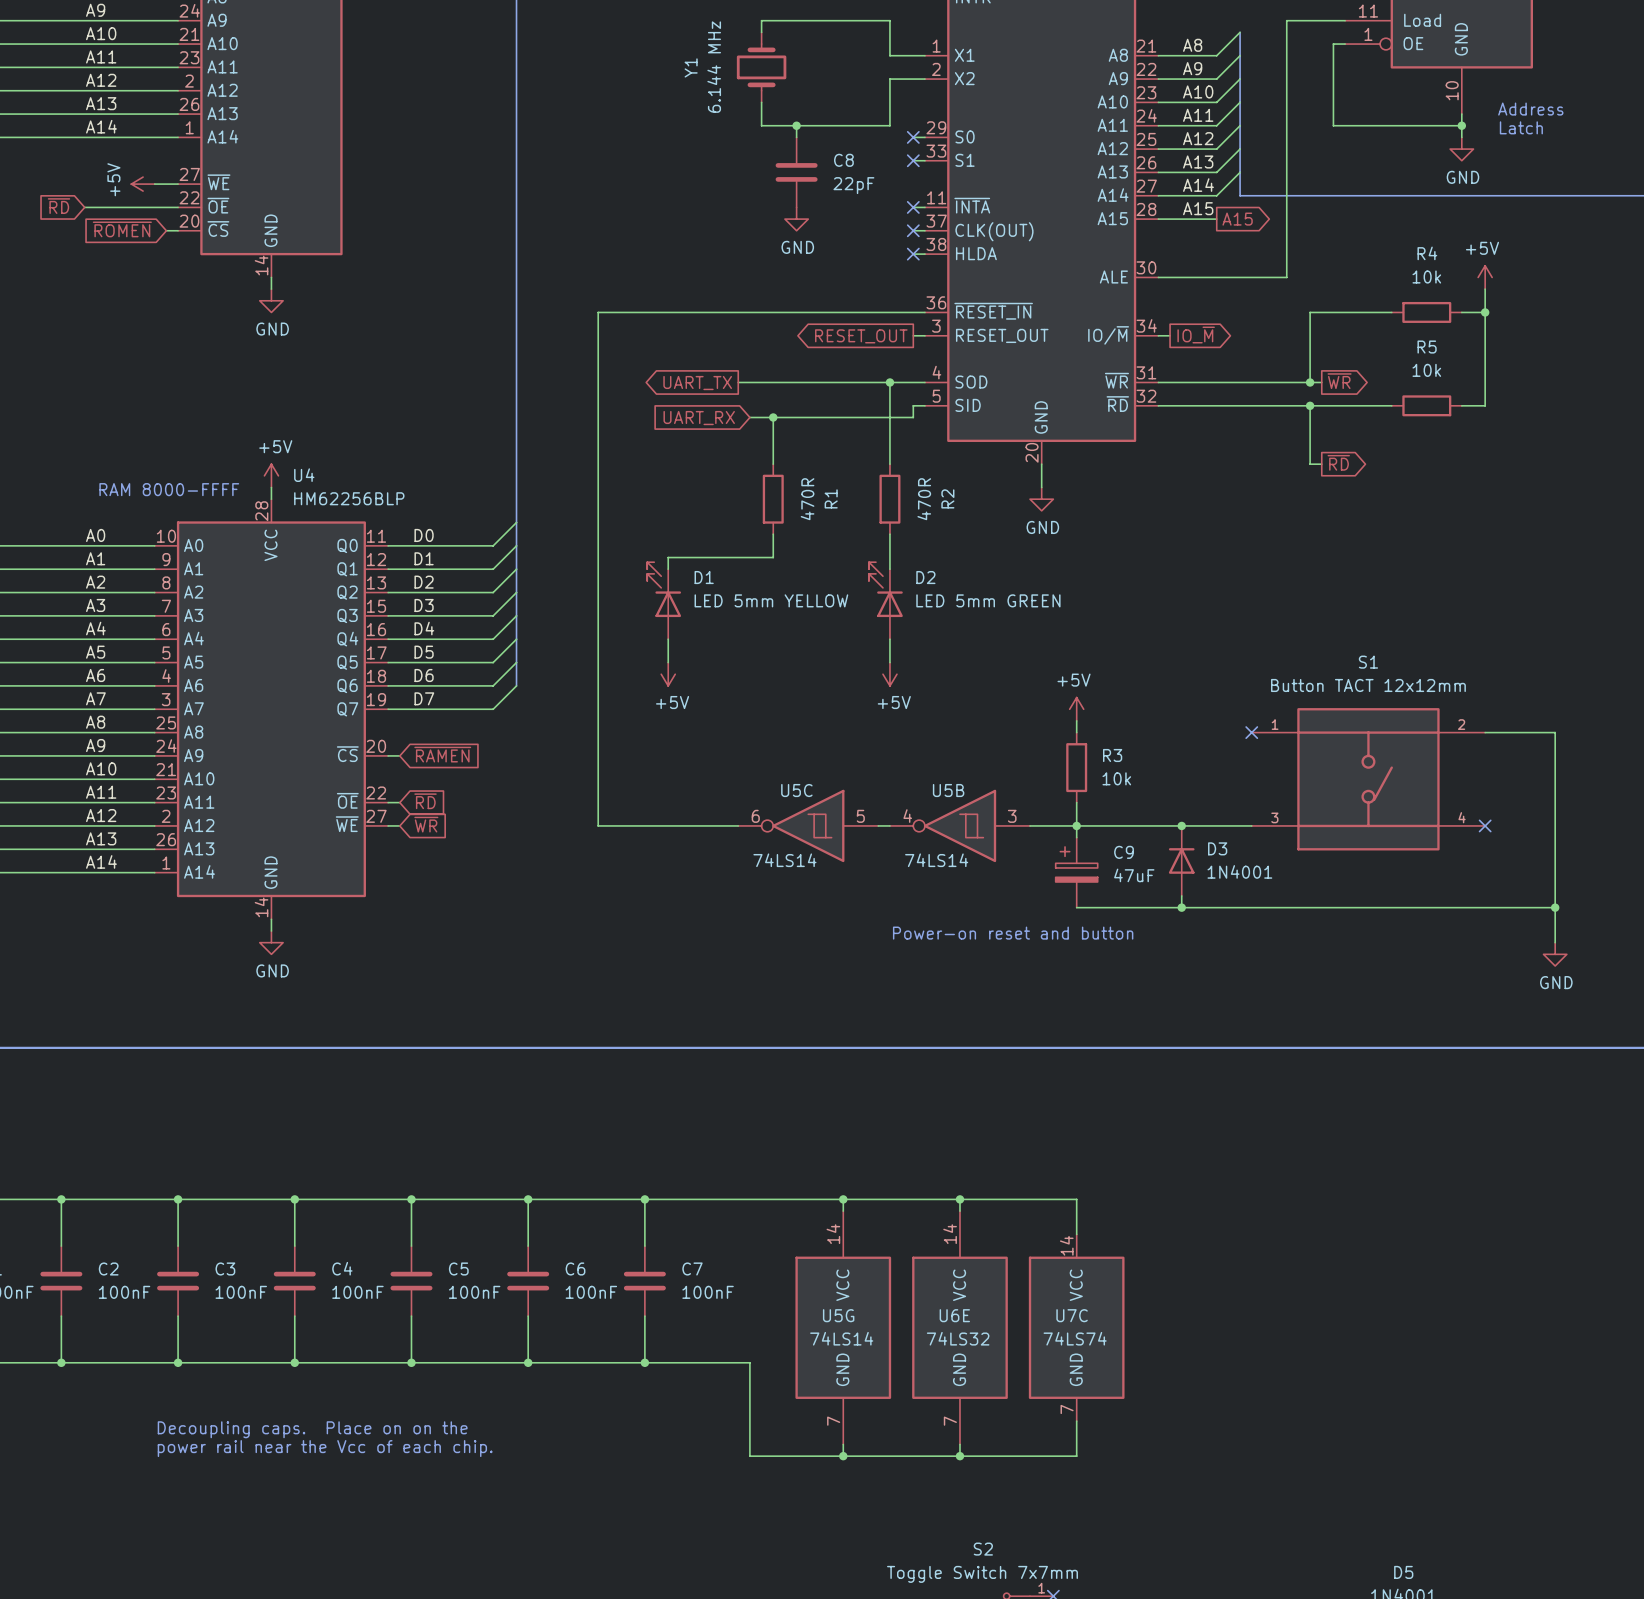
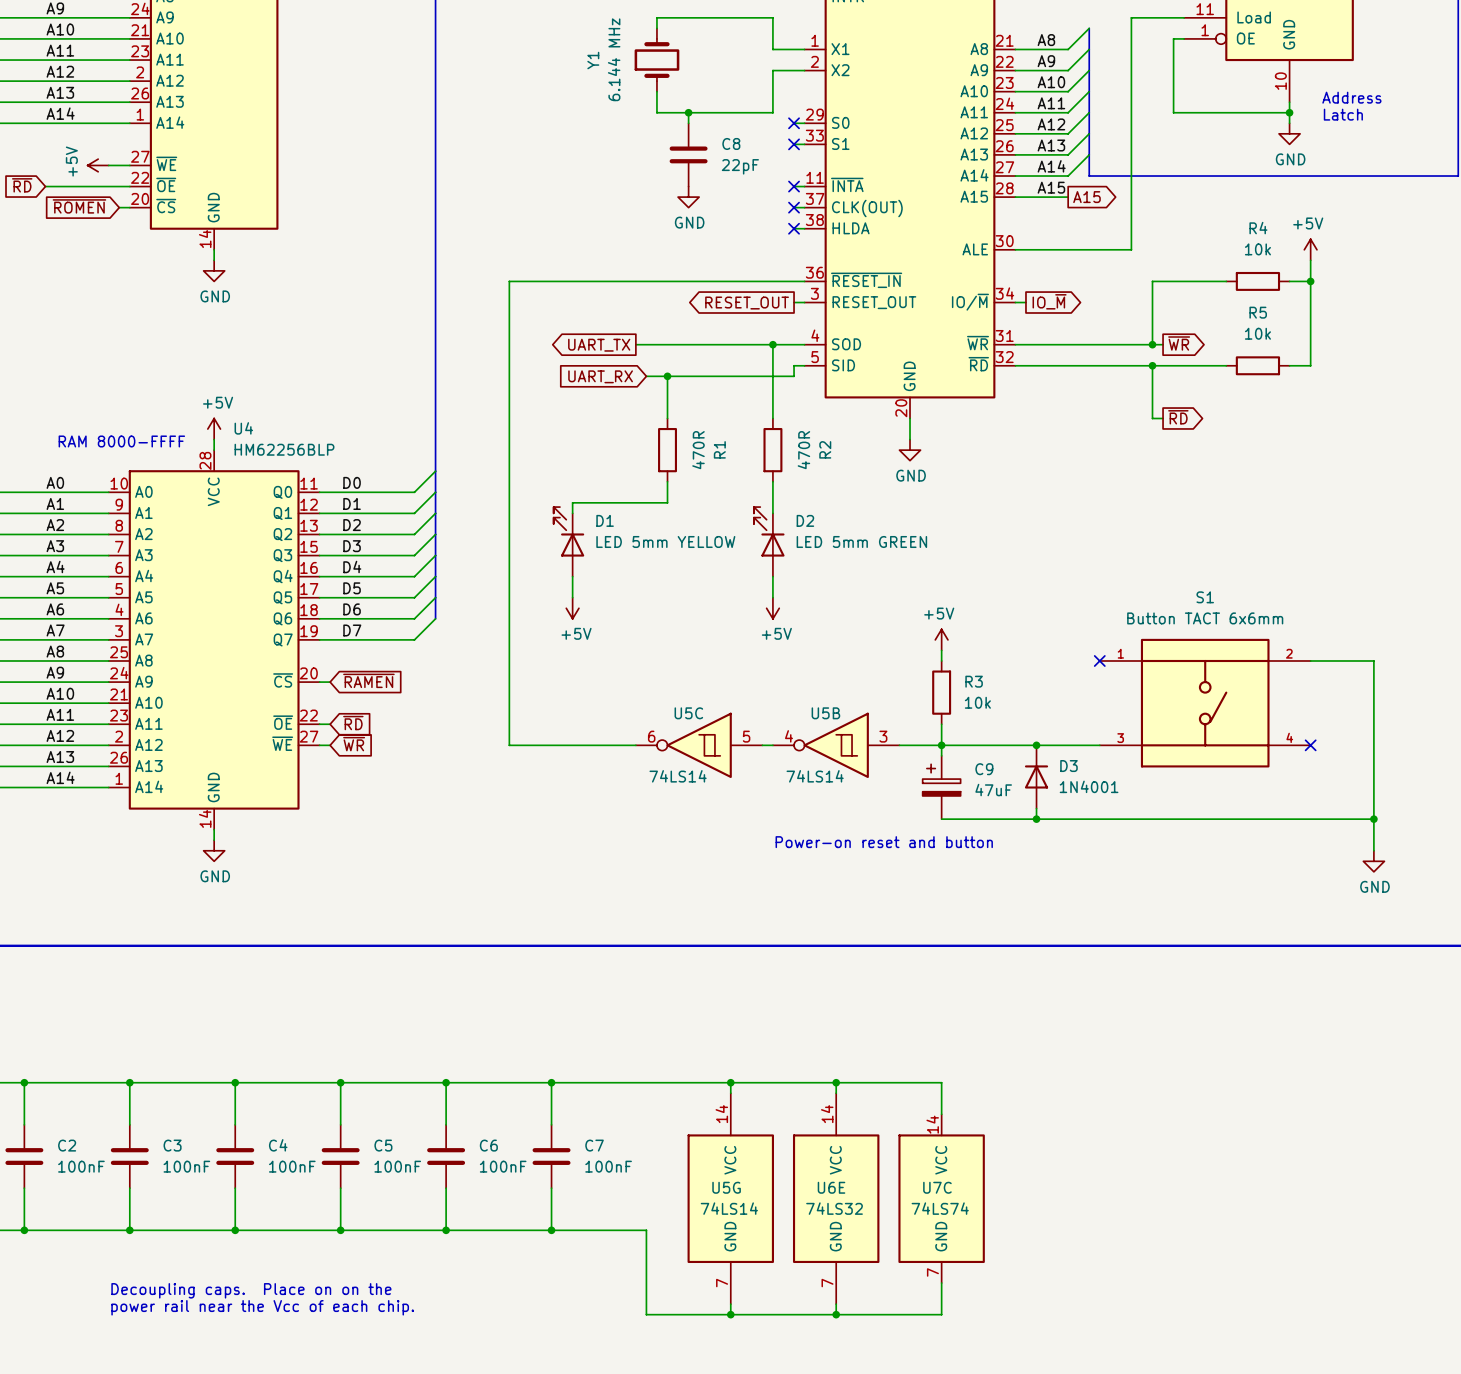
S1 value: Button TACT 12x12mm (1368, 685) -> Button TACT 6x6mm (1205, 618)

